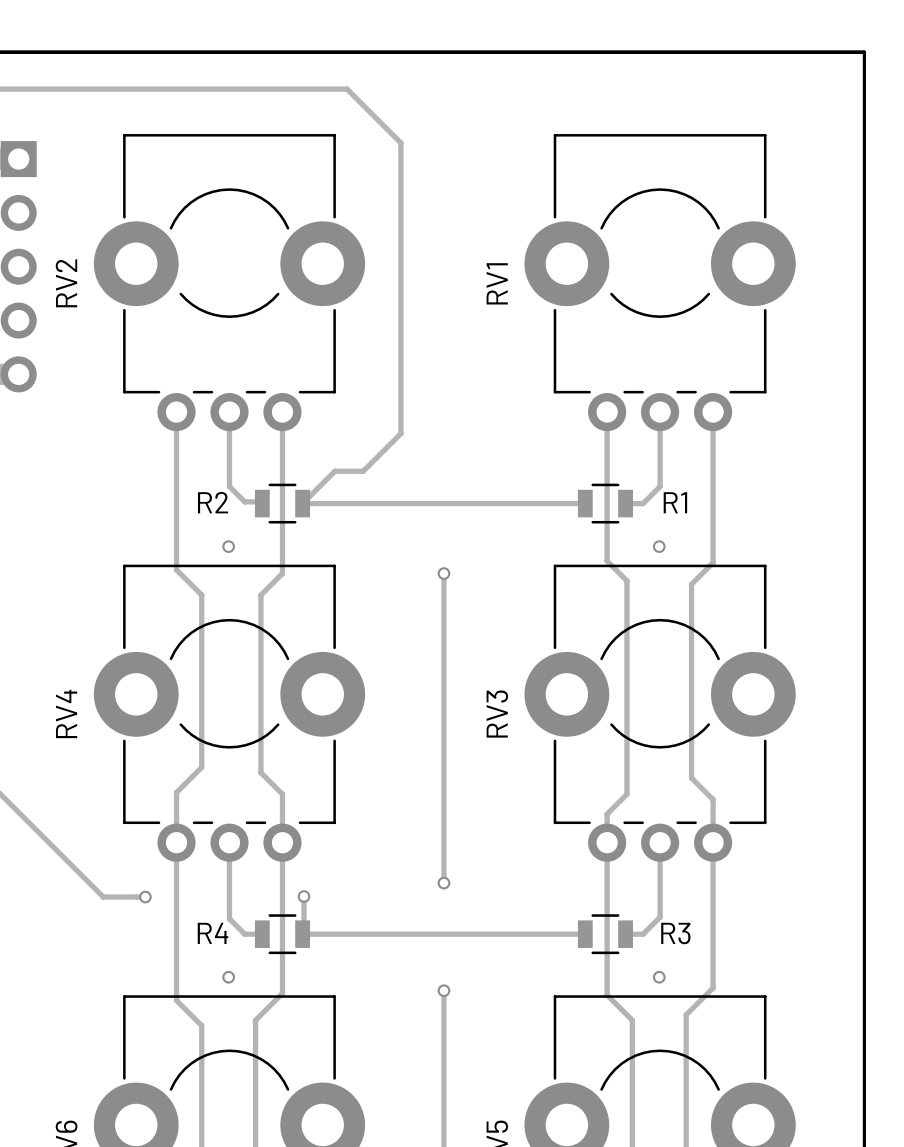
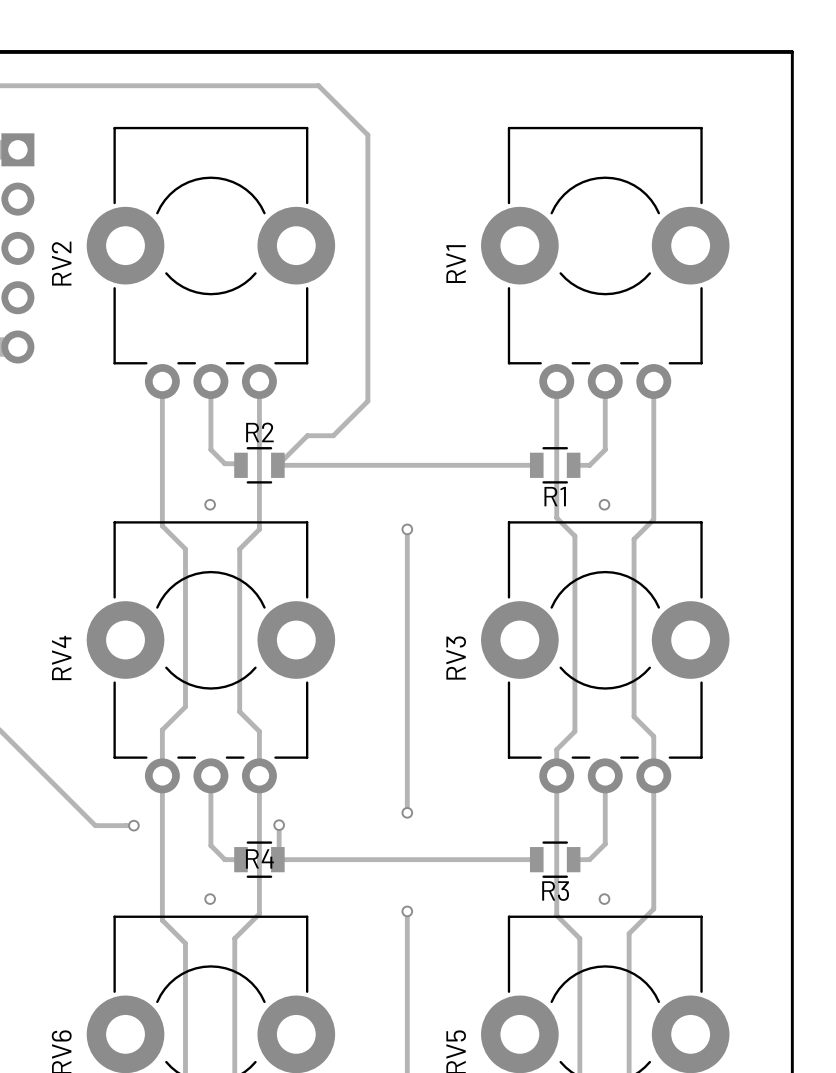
R2 name position: R2 (213, 502) -> R2 (259, 432)
R1 name position: R1 (675, 502) -> R1 (555, 496)
R4 name position: R4 (213, 933) -> R4 (259, 858)
R3 name position: R3 (675, 933) -> R3 (555, 891)

